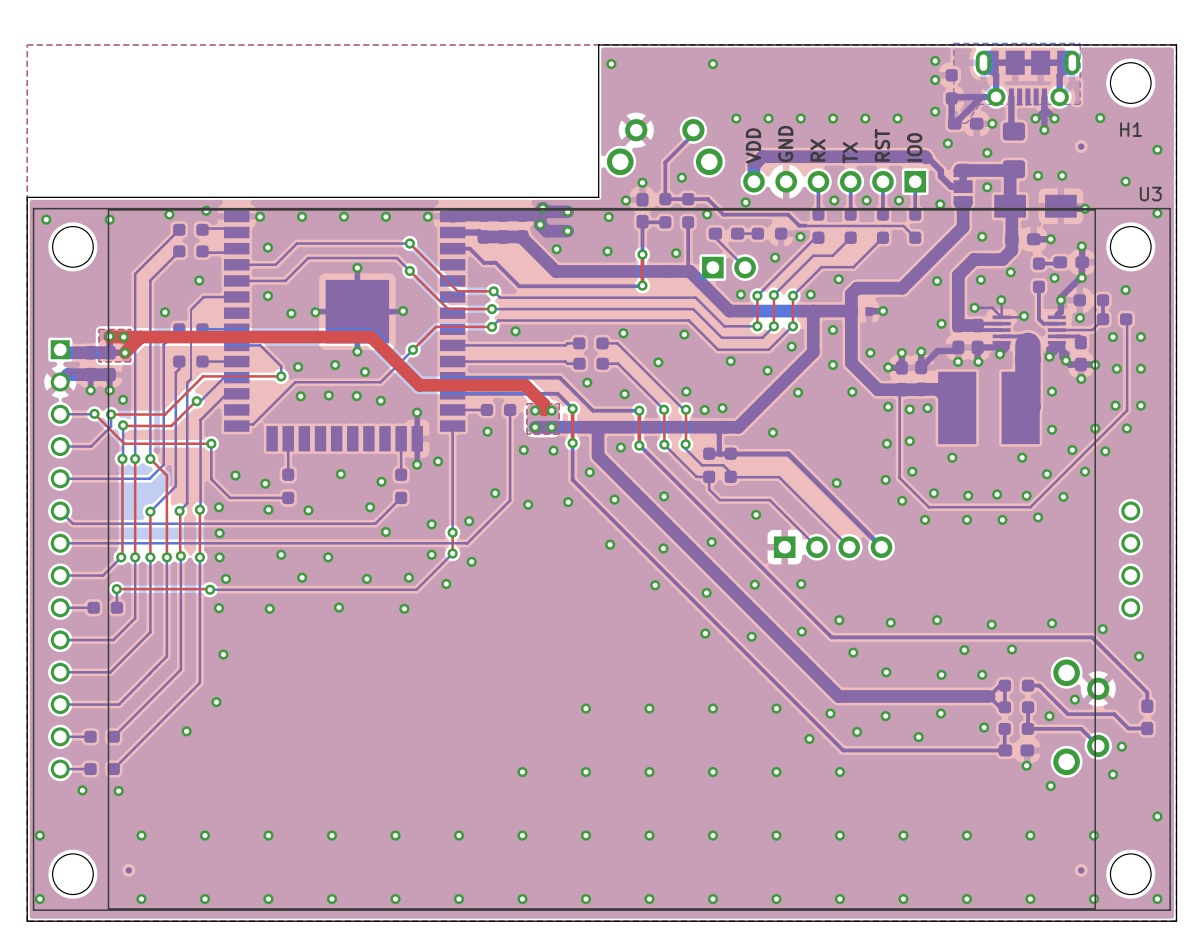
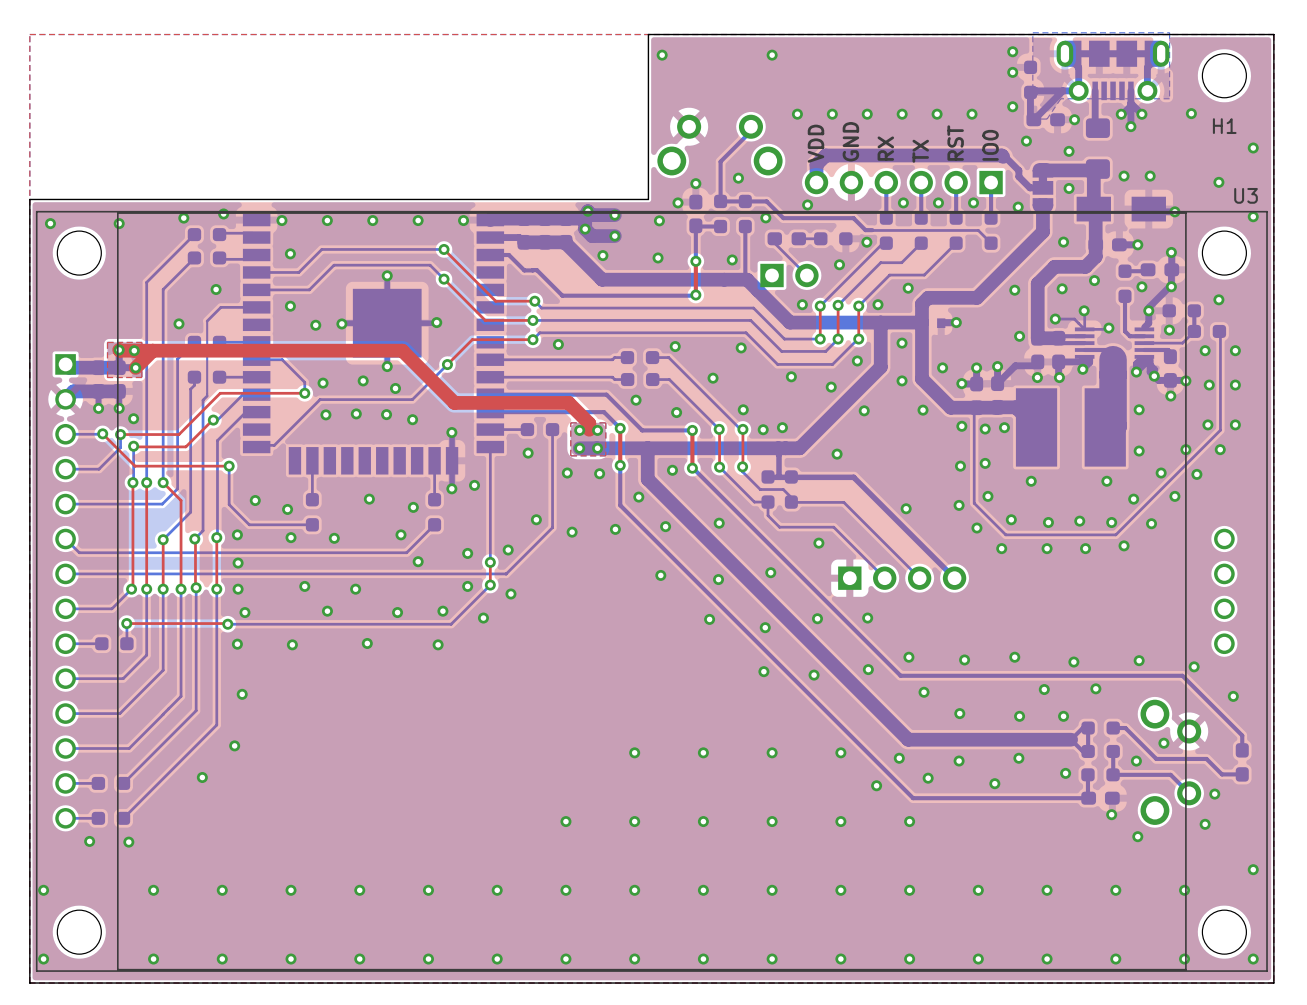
part: (1081, 146) -> none
part: (128, 870) -> none
part: (1081, 870) -> none

